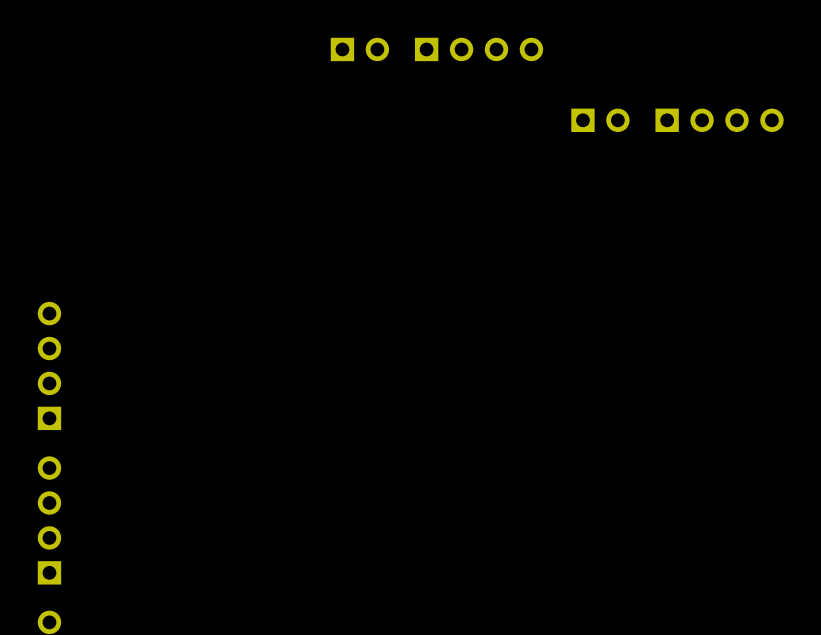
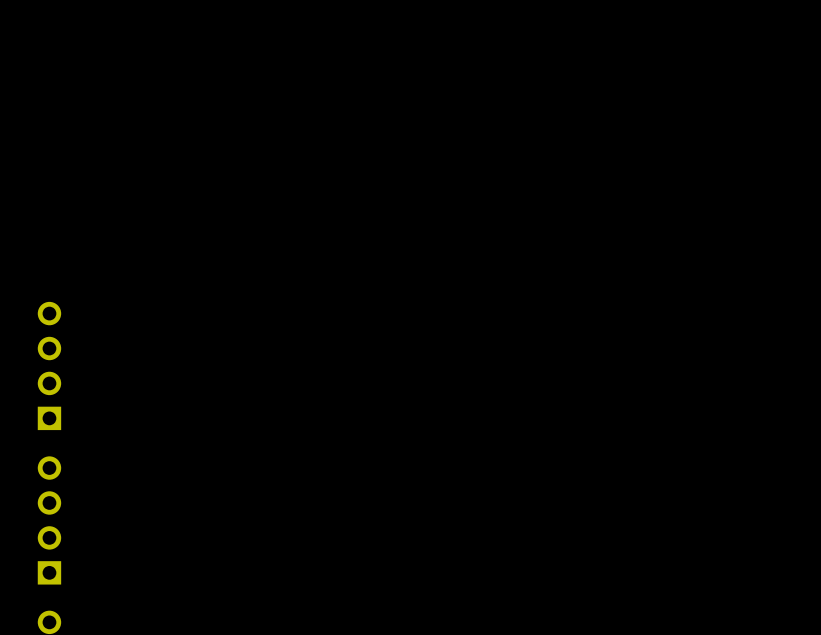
part: (359, 49) -> none
part: (479, 49) -> none
part: (600, 120) -> none
part: (719, 120) -> none

